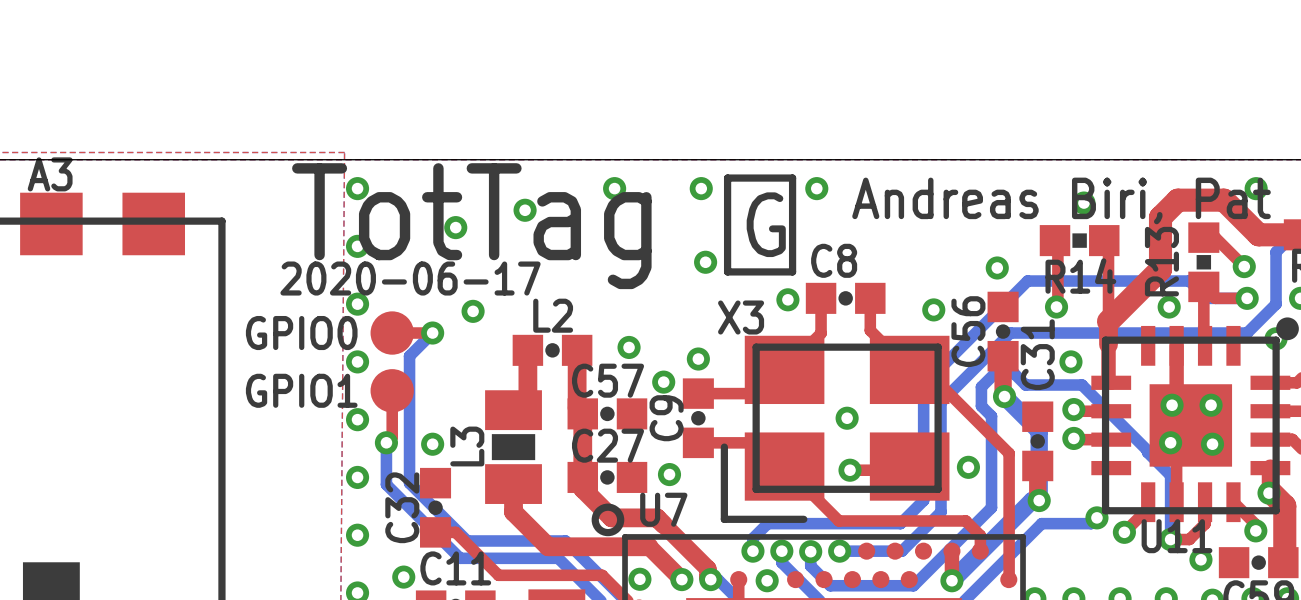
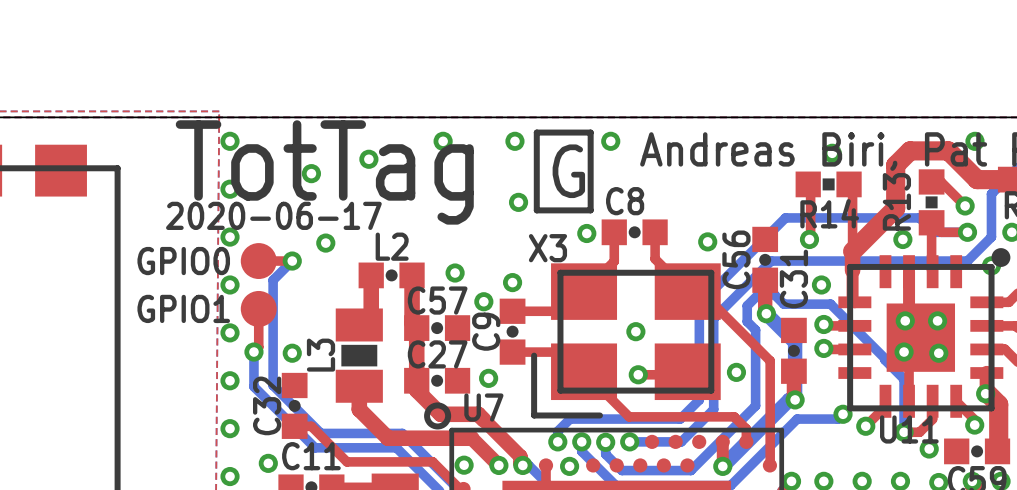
via: (997, 267) -> none

